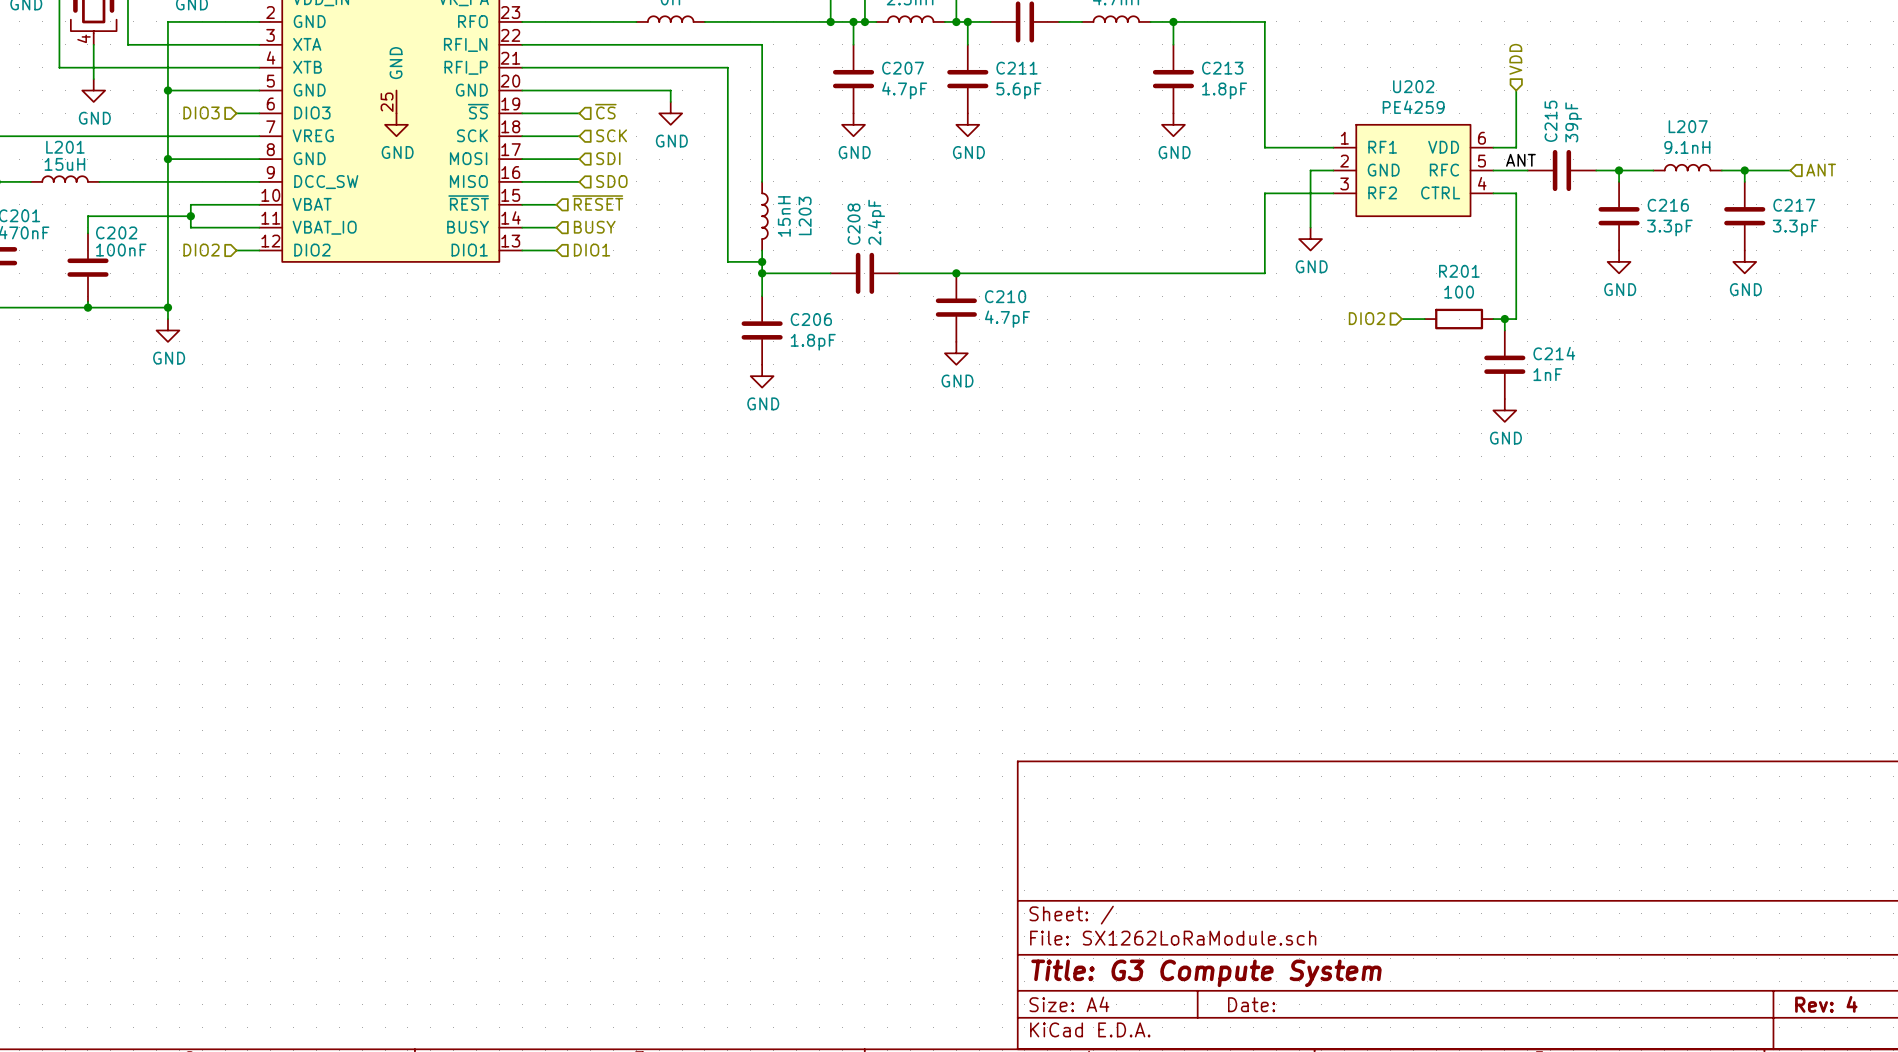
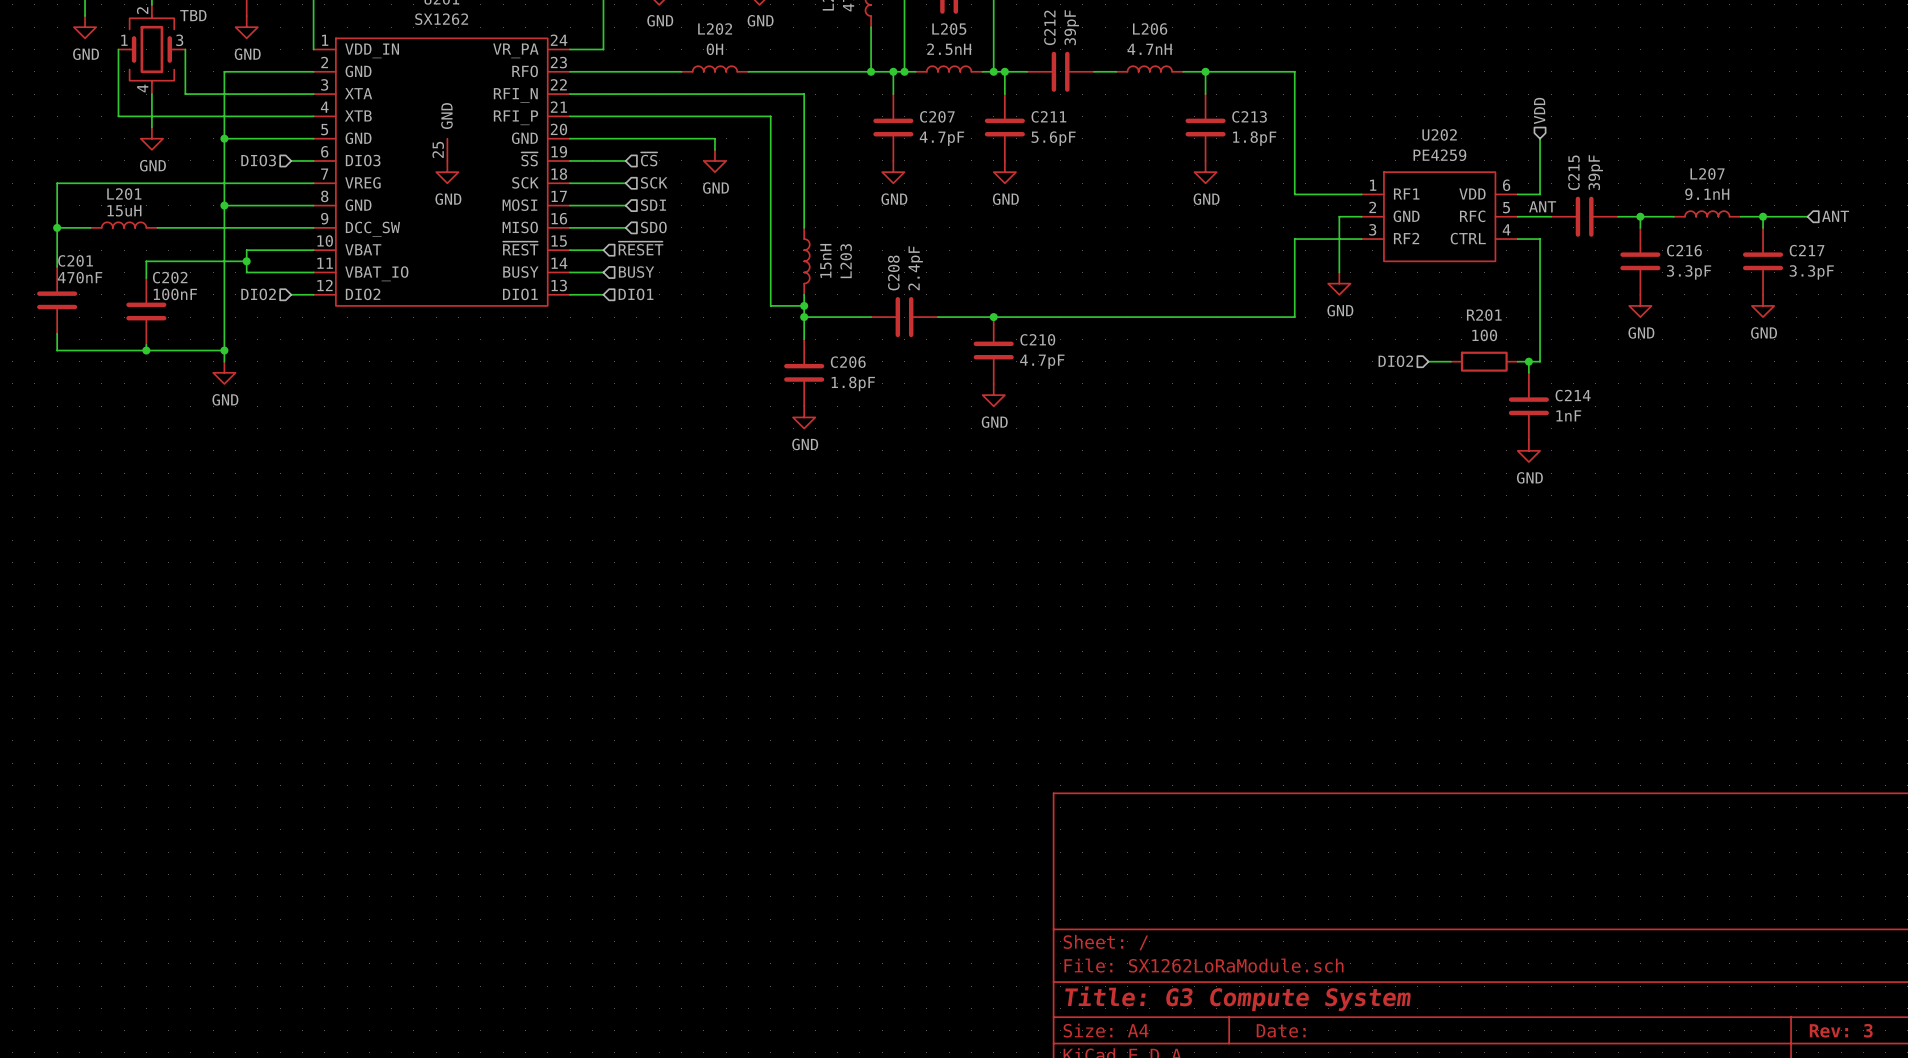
title block: Rev: 4 (1826, 1004) -> Rev: 3 (1841, 1030)

